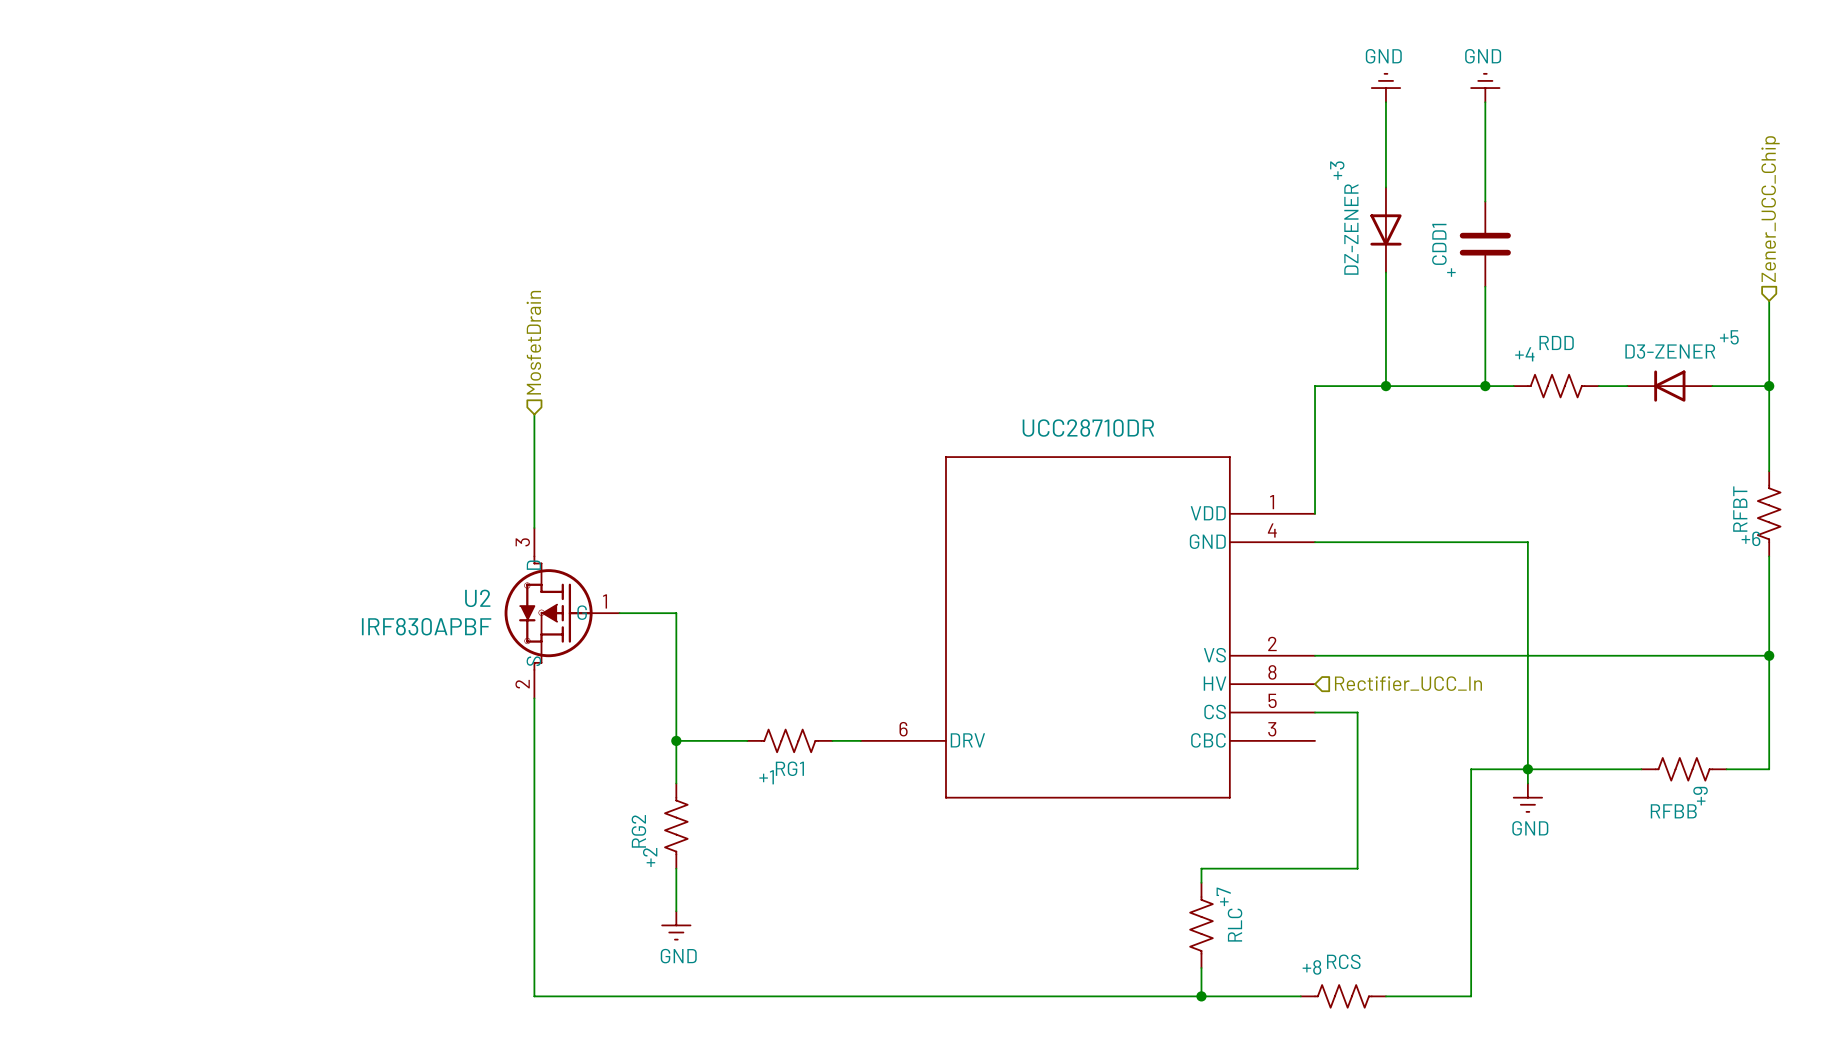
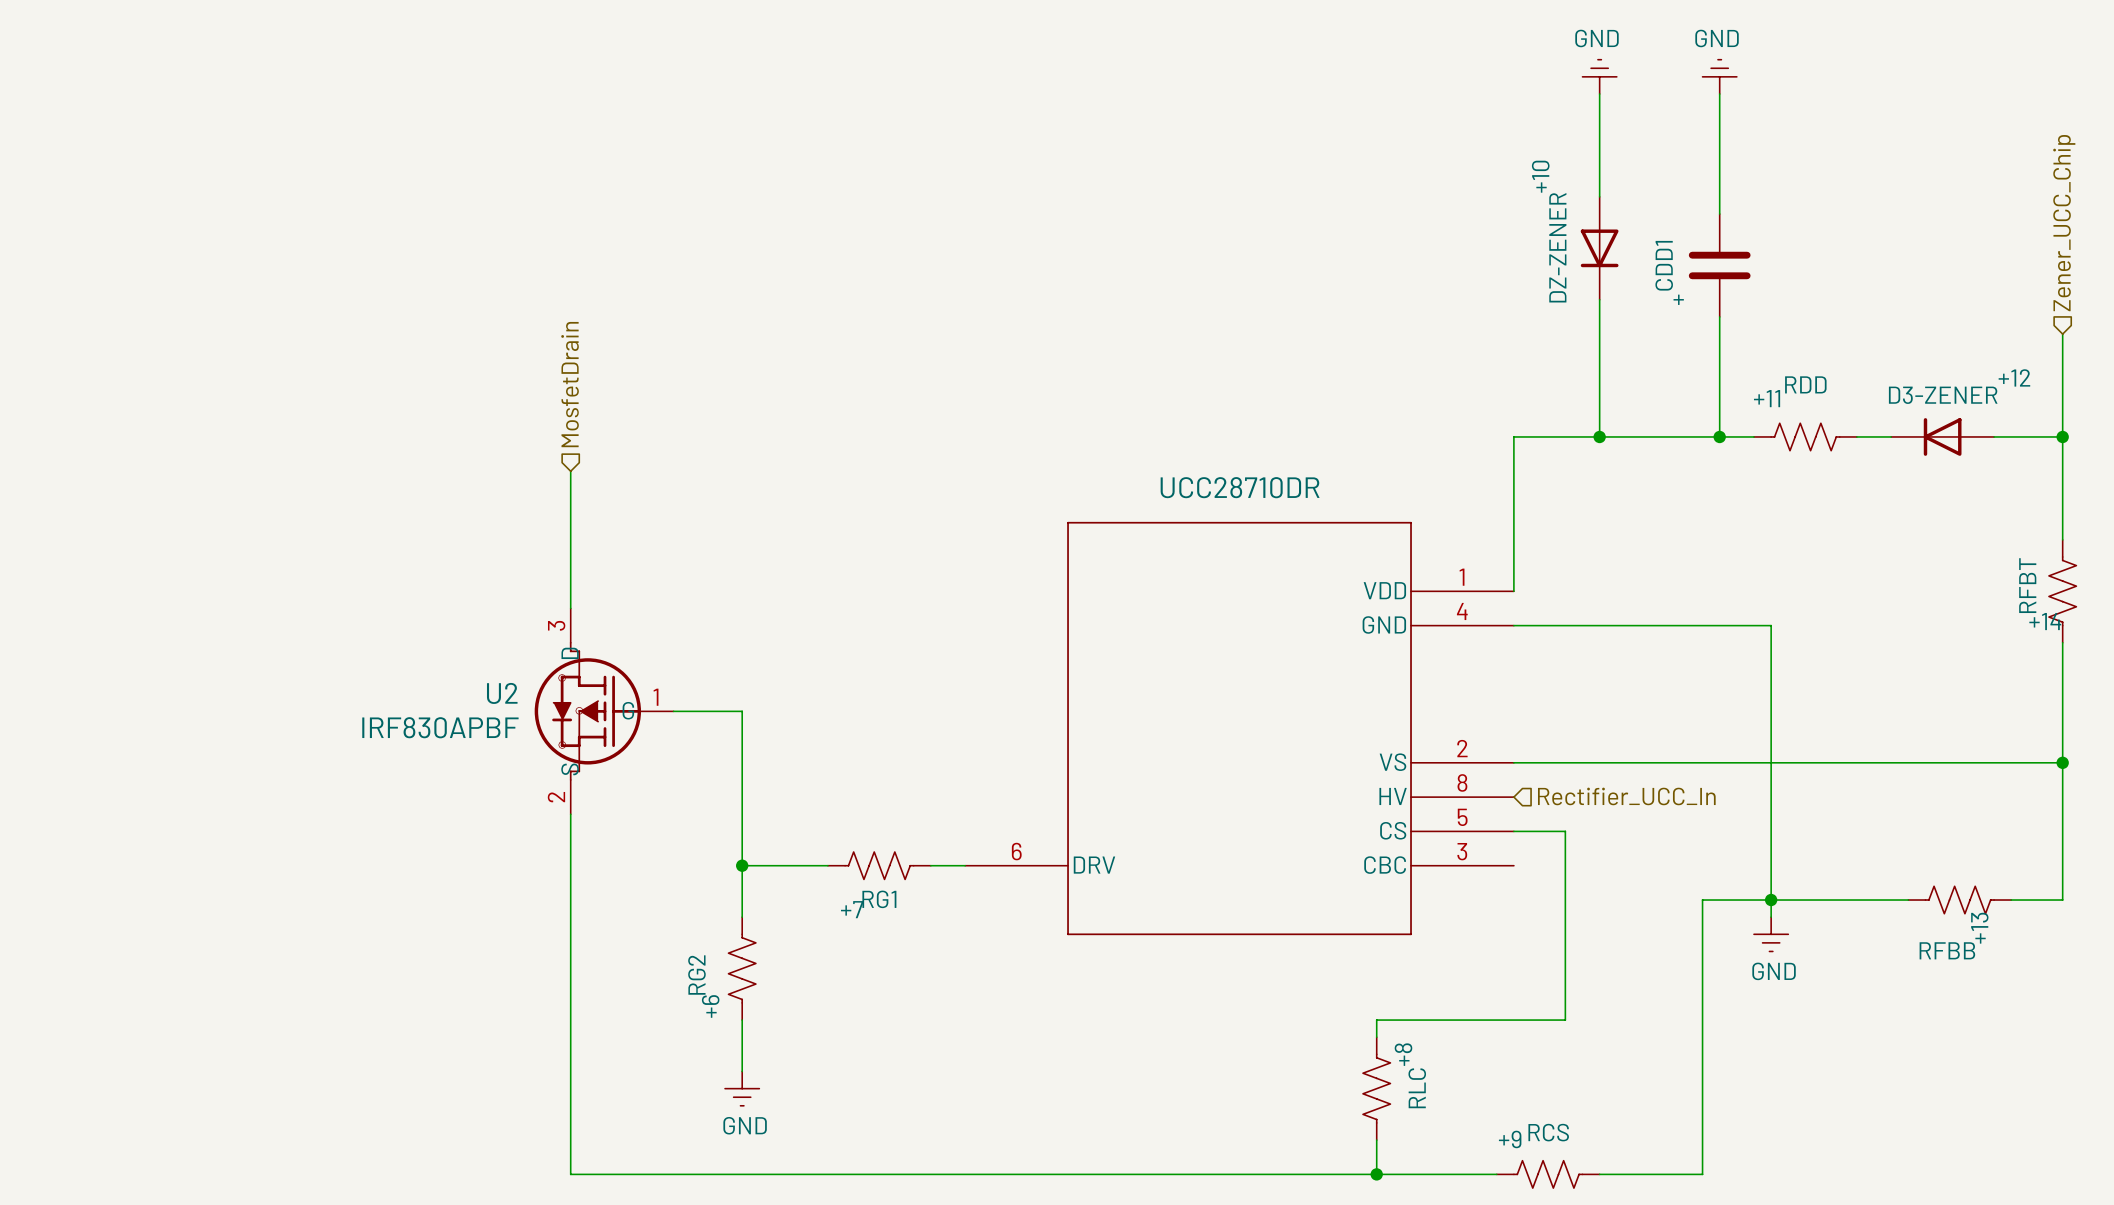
+3 name: +3 (1337, 170) -> +10 (1540, 176)
+5 name: +5 (1729, 337) -> +12 (2014, 377)
+4 name: +4 (1524, 354) -> +11 (1767, 398)
+6 name: +6 (1750, 538) -> +14 (2045, 621)
+1 name: +1 (766, 777) -> +7 (852, 909)
+9 name: +9 (1700, 796) -> +13 (1979, 928)
+2 name: +2 (650, 857) -> +6 (710, 1006)
+7 name: +7 (1223, 896) -> +8 (1403, 1054)
+8 name: +8 (1311, 967) -> +9 (1510, 1139)

